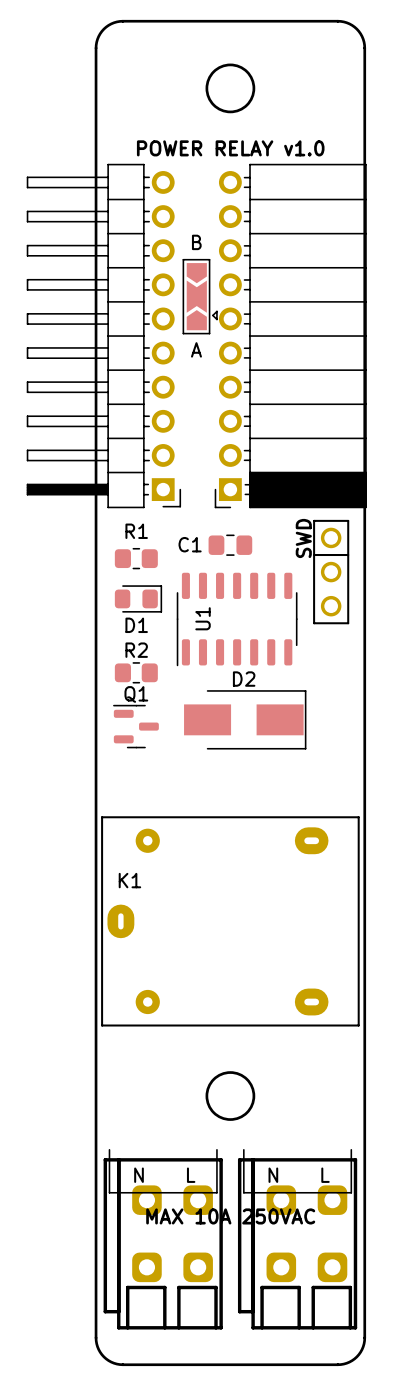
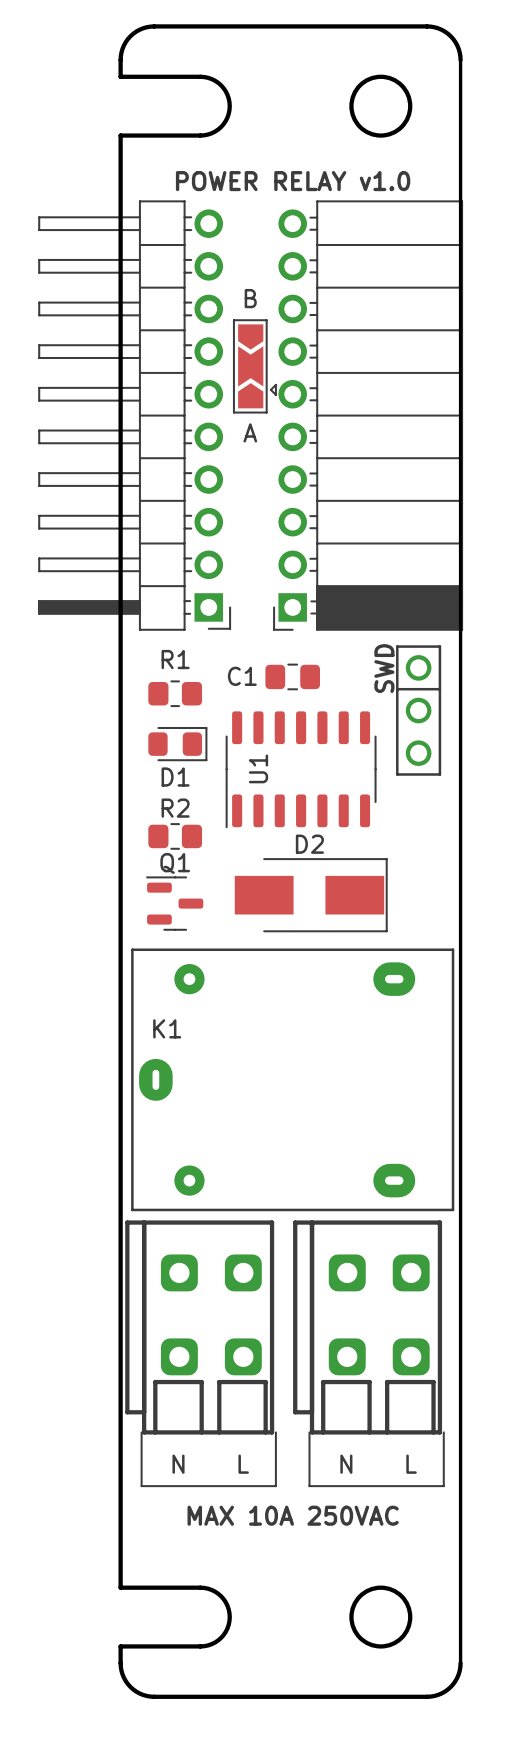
board edge: (364, 51) (363, 39) (358, 31) (349, 23) (337, 21) (119, 21) (111, 23) (101, 31) (97, 39) (96, 48) (96, 1343) (100, 1352) (106, 1358) (119, 1364) (337, 1364) (349, 1362) (358, 1354) (363, 1346) (364, 1334) -> (460, 60) (458, 48) (450, 36) (441, 29) (427, 26) (150, 26) (133, 33) (125, 42) (121, 52) (120, 76) (207, 77) (223, 88) (229, 106) (223, 124) (207, 134) (120, 135) (120, 1587) (207, 1588) (221, 1596) (228, 1609) (229, 1620) (225, 1631) (211, 1644) (200, 1646) (120, 1646) (120, 1666) (123, 1677) (133, 1689) (146, 1695) (430, 1696) (441, 1693) (450, 1686) (458, 1674) (460, 1663)
round board edge: [205, 63, 256, 114] -> none
round board edge: none -> [349, 74, 413, 138]
K1 position: (230, 921) -> (292, 1079)
part: none -> (199, 1327)
part: none -> (367, 1327)
round board edge: [205, 1071, 256, 1121] -> none
part: (163, 1243) -> none
part: (297, 1243) -> none
round board edge: none -> [349, 1585, 413, 1649]

